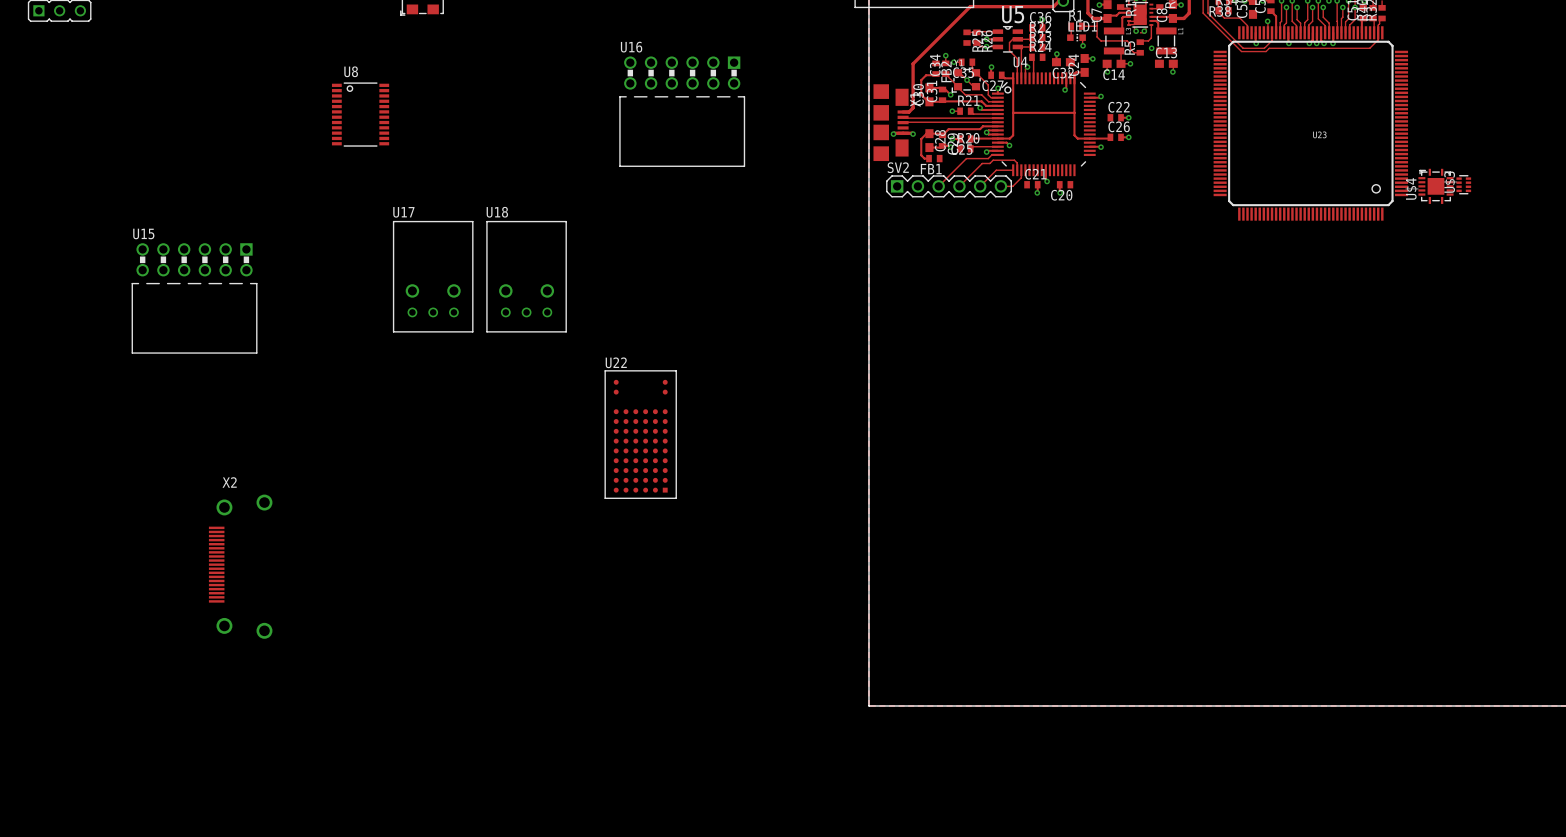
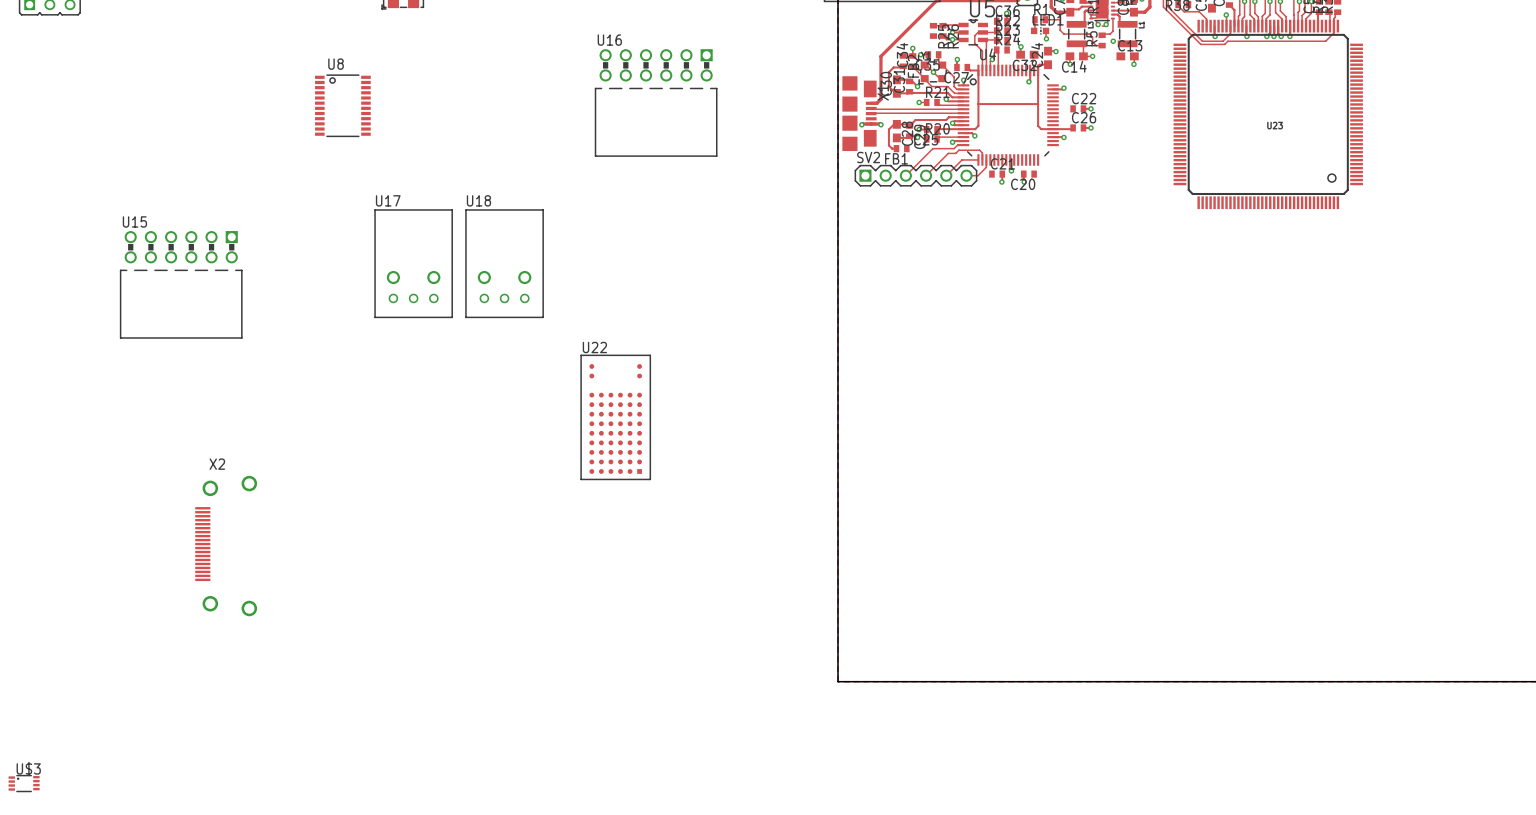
U$3 footprint: [1456, 175, 1472, 195] -> [8, 775, 40, 793]
U$3 name position: U$3 (1450, 182) -> U$3 (28, 768)
U$4: (1435, 186) -> none

